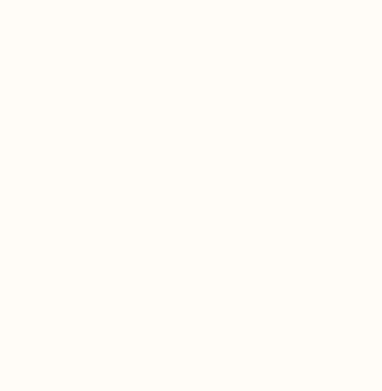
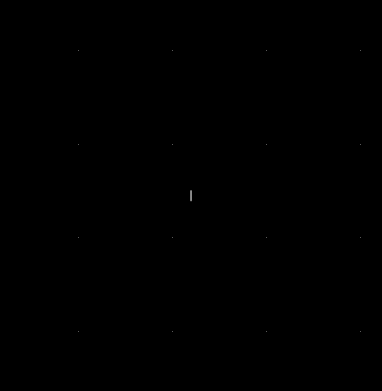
line: none -> (191, 191) (191, 200)

